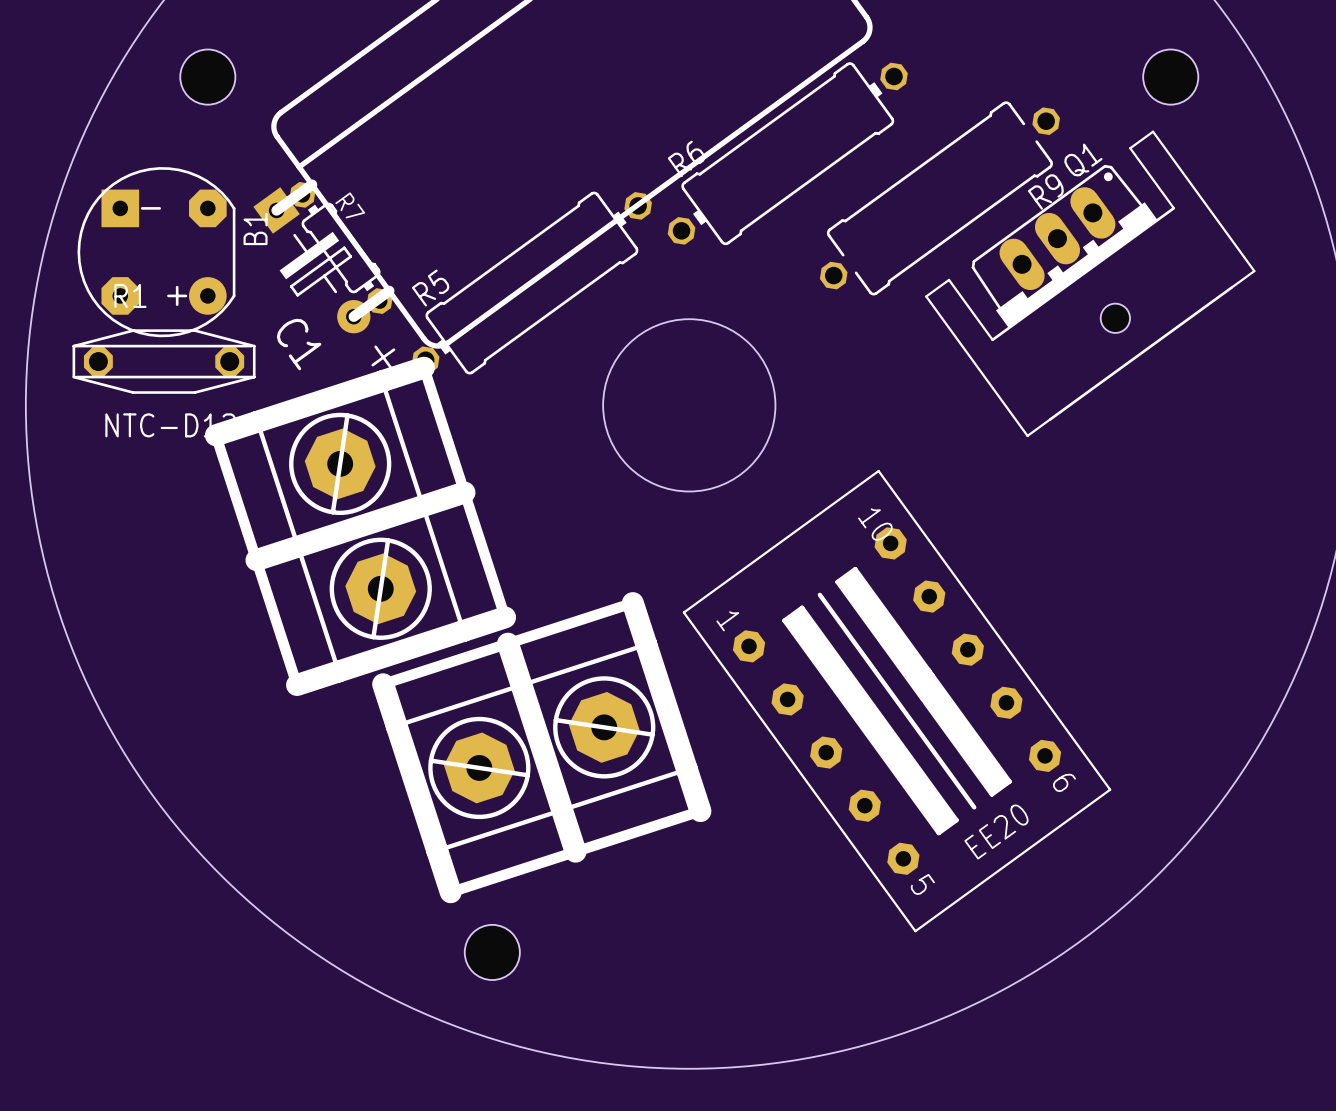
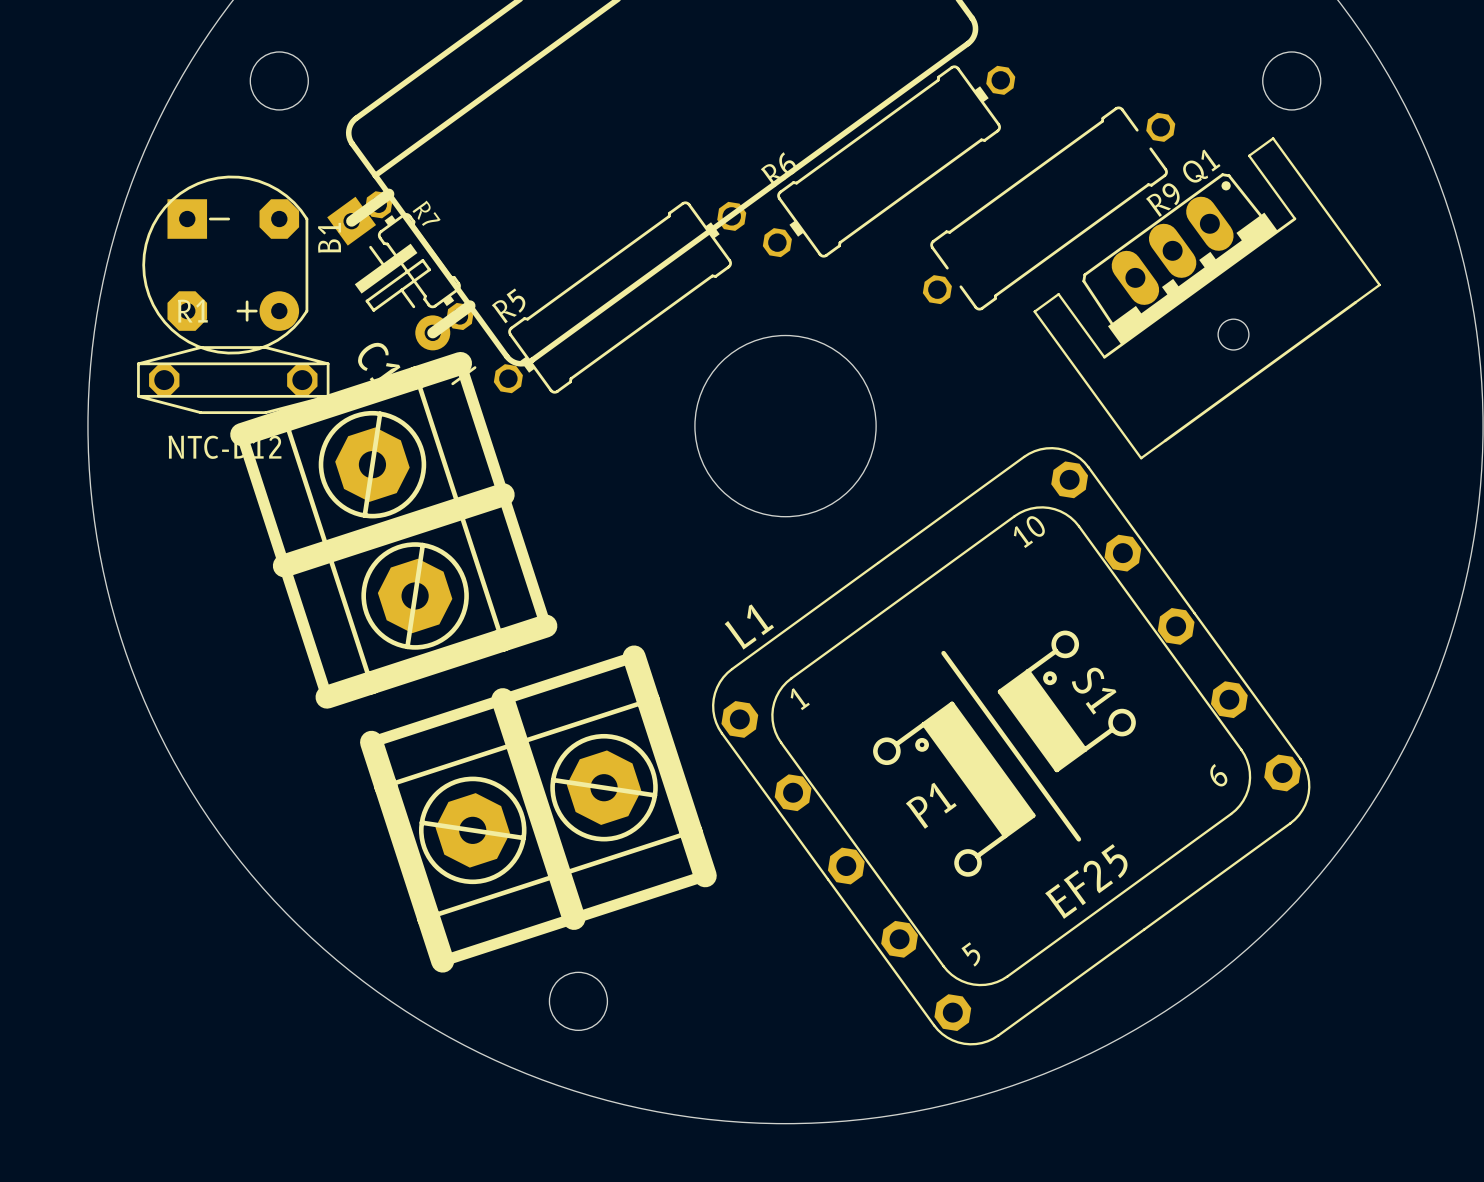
part position: (360, 526) -> (393, 530)
part: (897, 701) -> none
L1: none -> (1011, 746)
part position: (541, 747) -> (538, 809)

